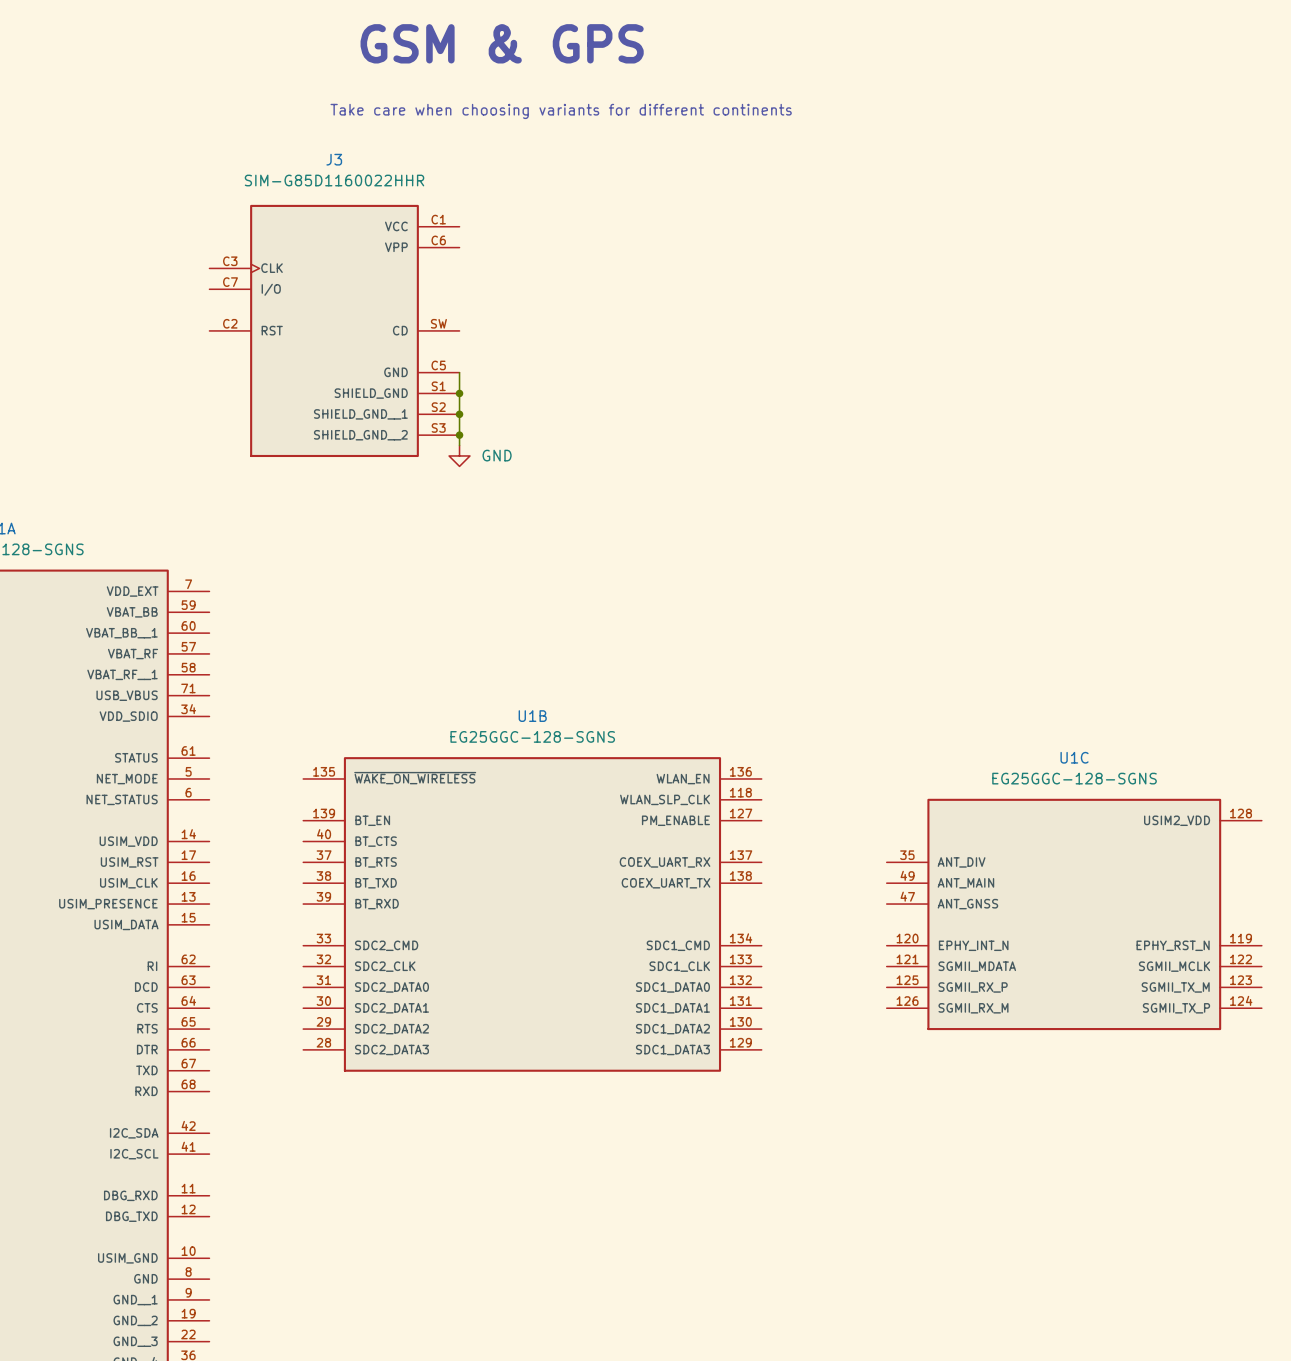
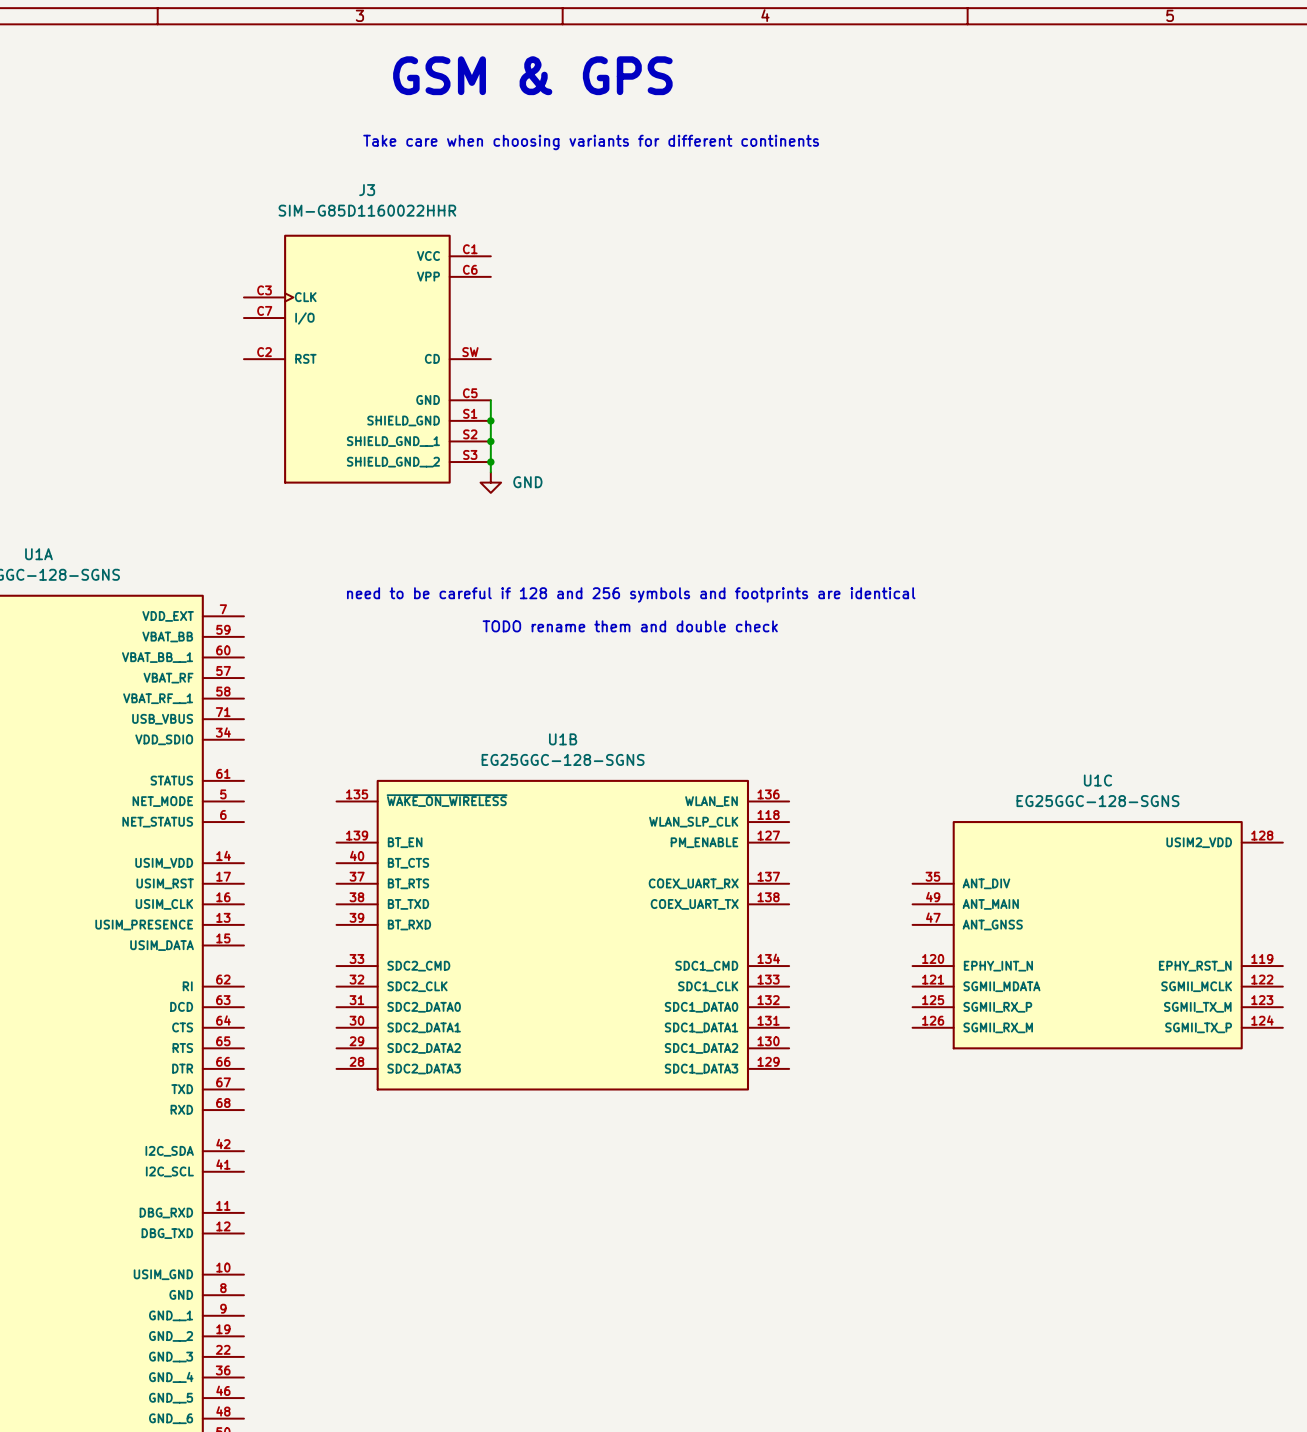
text: none -> need to be careful if 128 and 256 symbols and footprints are identical (631, 594)
text: none -> TODO rename them and double check (630, 626)

